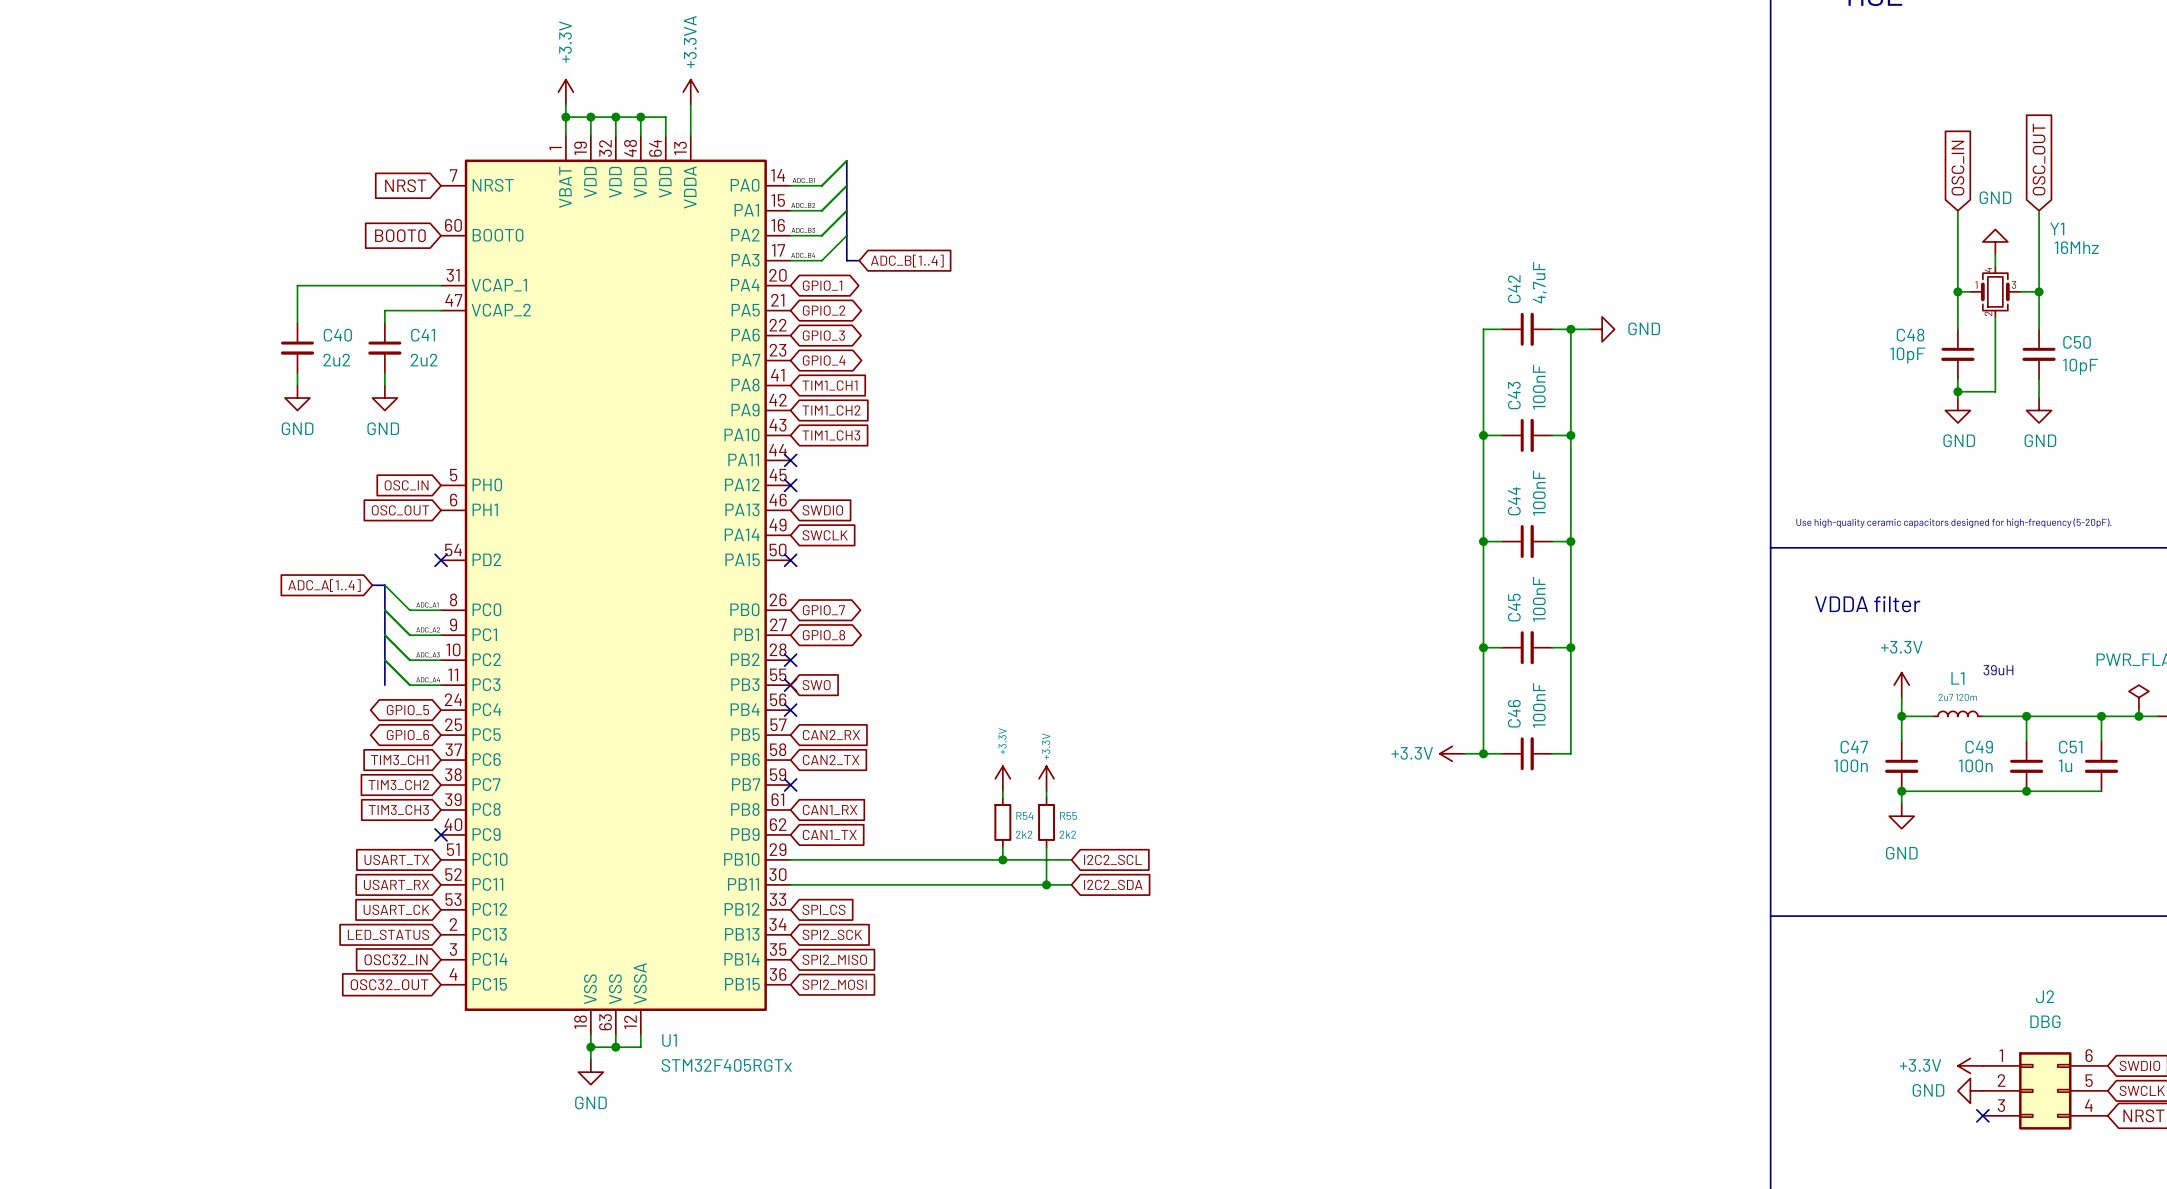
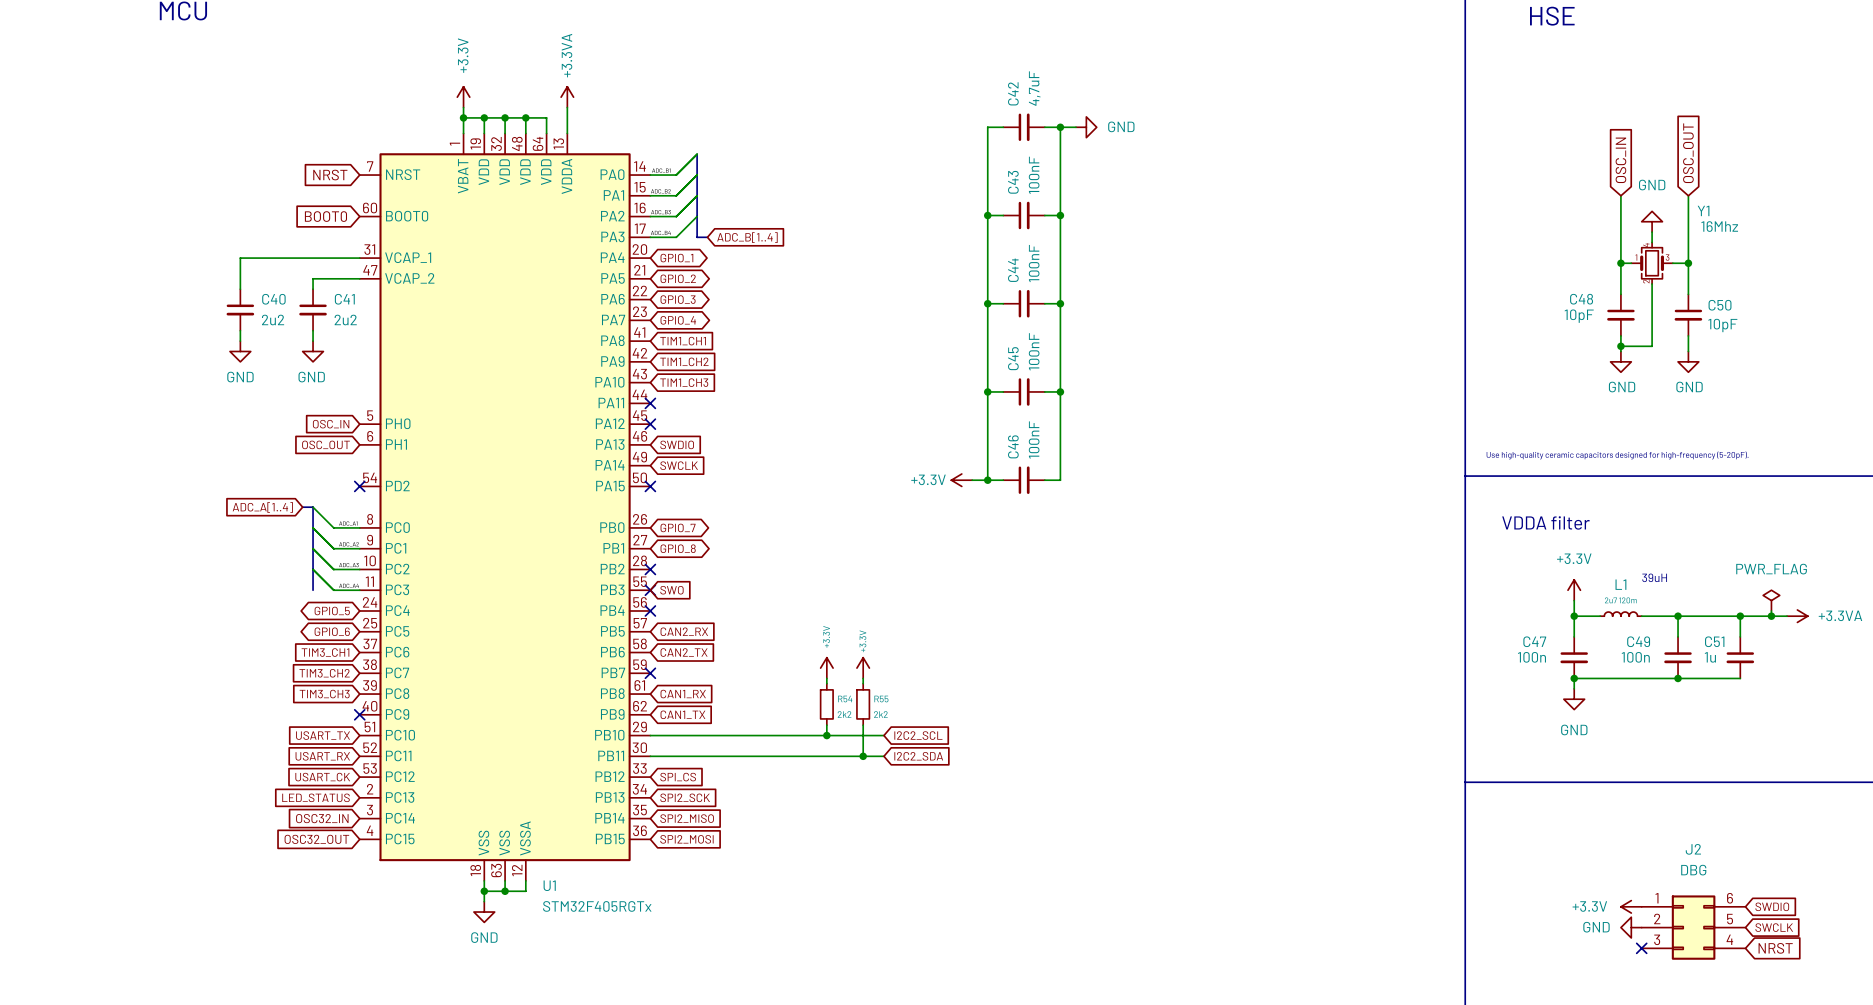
wire: none -> (1003, 127) (987, 127) (987, 480)
wire: none -> (1044, 127) (1075, 127)
wire: none -> (1060, 127) (1060, 480) (1044, 480)
junction: none -> (1060, 127)
power symbol: none -> GND (1086, 127)
wire: none -> (987, 215) (1003, 215)
junction: none -> (987, 215)
wire: none -> (1044, 215) (1060, 215)
junction: none -> (1060, 215)
wire: (1502, 329) (1483, 329) (1483, 753) -> none
C42 position: (1527, 329) -> (1024, 127)
wire: (1552, 329) (1589, 329) -> none
wire: (1570, 329) (1570, 753) (1552, 753) -> none
junction: (1570, 329) -> none
power symbol: GND (1602, 329) -> none
wire: none -> (987, 303) (1003, 303)
junction: none -> (987, 303)
junction: none -> (1060, 303)
wire: (1483, 435) (1502, 435) -> (1044, 303) (1060, 303)
junction: (1483, 435) -> none
C43 position: (1527, 435) -> (1024, 215)
wire: (1552, 435) (1570, 435) -> none
junction: (1570, 435) -> none
wire: none -> (987, 391) (1003, 391)
junction: none -> (987, 391)
junction: none -> (1060, 391)
wire: (1483, 541) (1502, 541) -> (1044, 391) (1060, 391)
junction: (1483, 541) -> none
C44 position: (1527, 541) -> (1024, 303)
wire: (1552, 541) (1570, 541) -> none
junction: (1570, 541) -> none
power symbol: none -> +3.3V (961, 480)
wire: none -> (972, 480) (1003, 480)
junction: none -> (987, 480)
wire: (1483, 647) (1502, 647) -> none
junction: (1483, 647) -> none
C45 position: (1527, 647) -> (1024, 391)
wire: (1552, 647) (1570, 647) -> none
junction: (1570, 647) -> none
power symbol: +3.3V (1452, 753) -> none
wire: (1464, 753) (1502, 753) -> none
junction: (1483, 753) -> none
C46 position: (1527, 753) -> (1024, 480)

